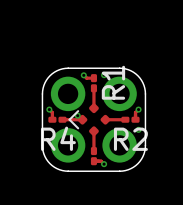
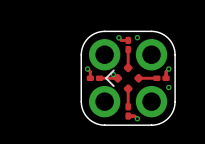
R1 name: R1 (113, 82) -> none
R4 name: R4 (58, 138) -> none
R2 name: R2 (130, 139) -> none

